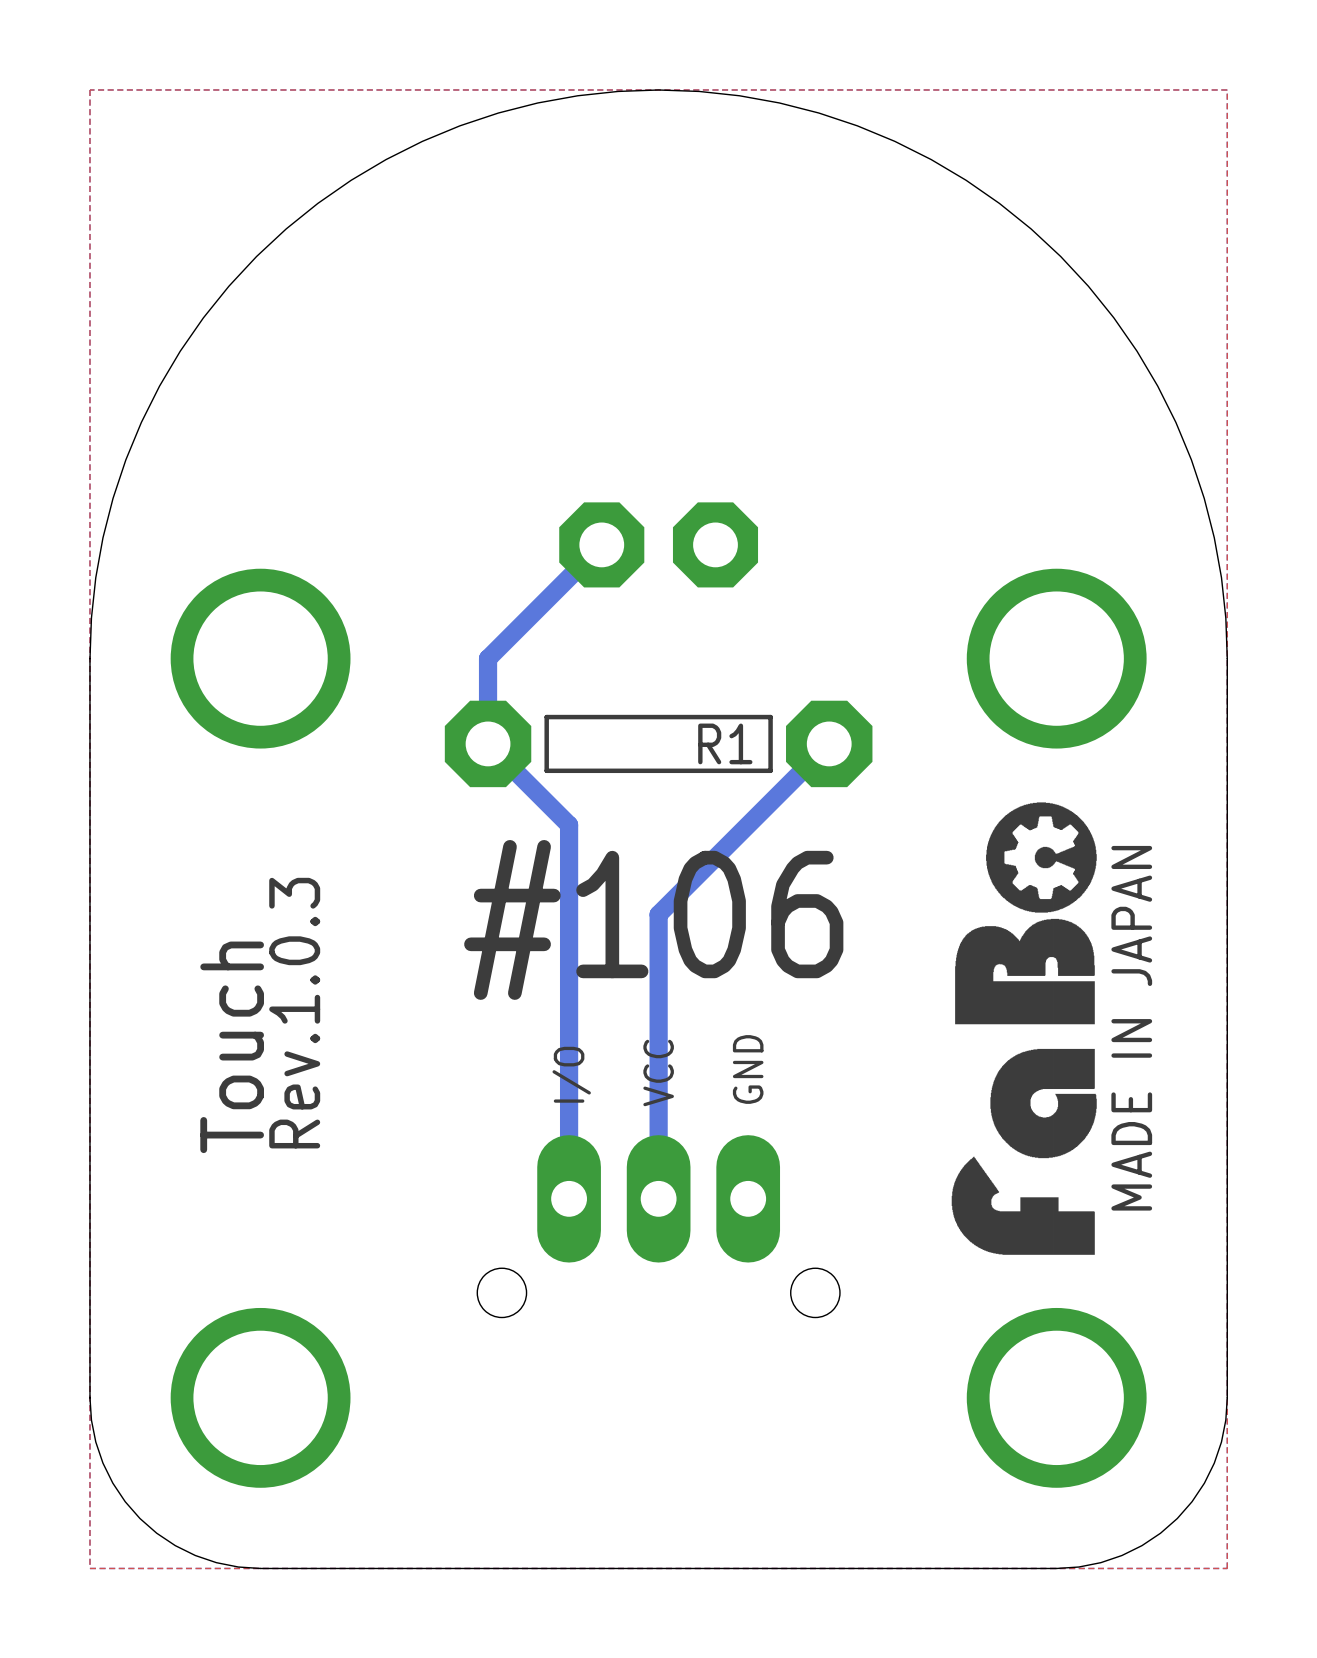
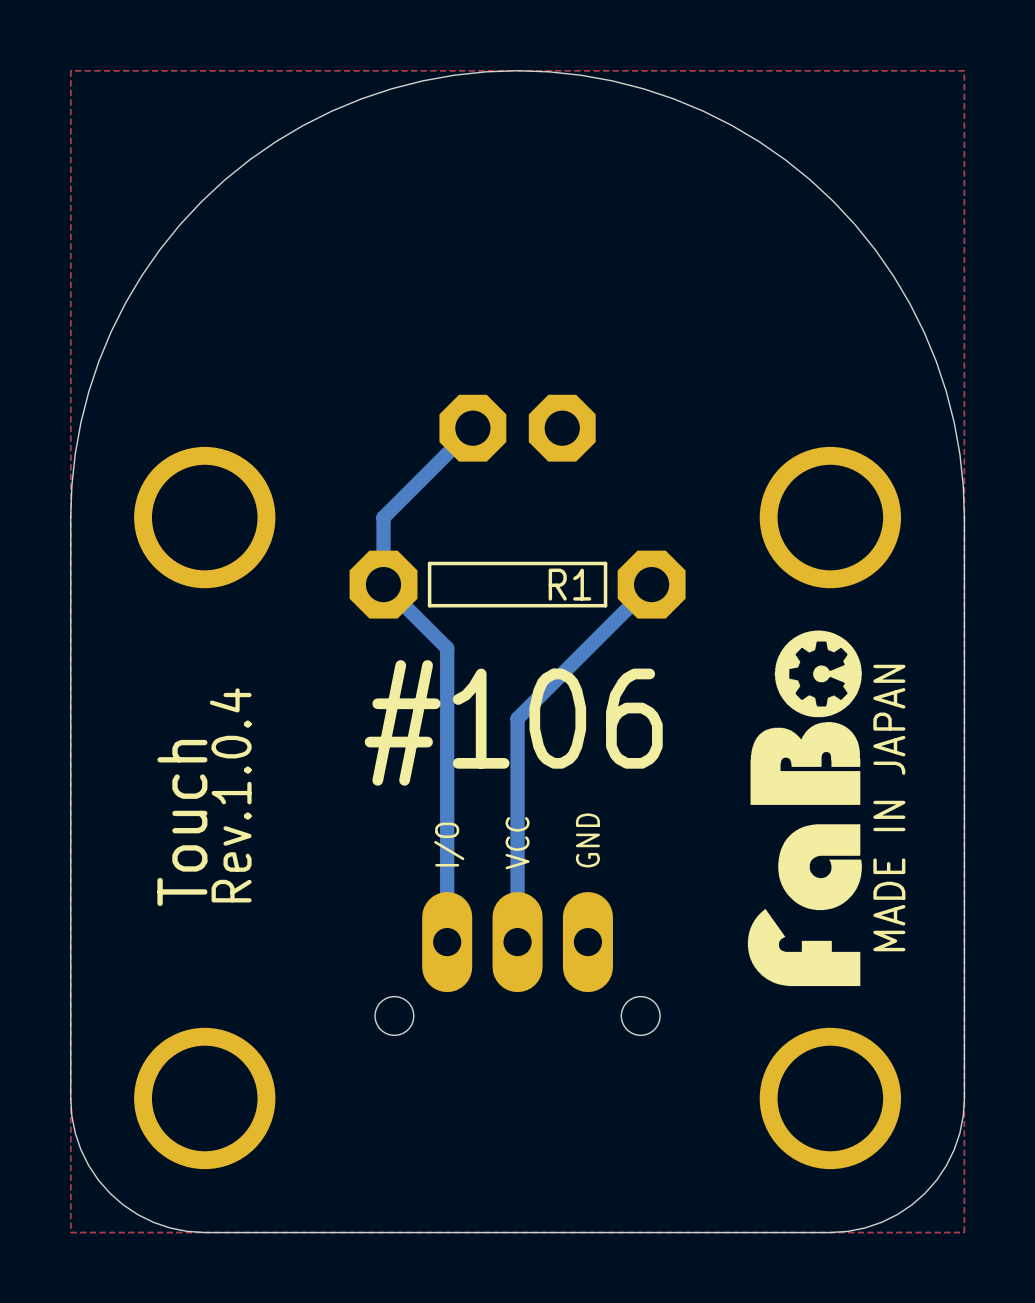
text: Rev.1.0.3 (294, 1013) -> Rev.1.0.4 (230, 795)

